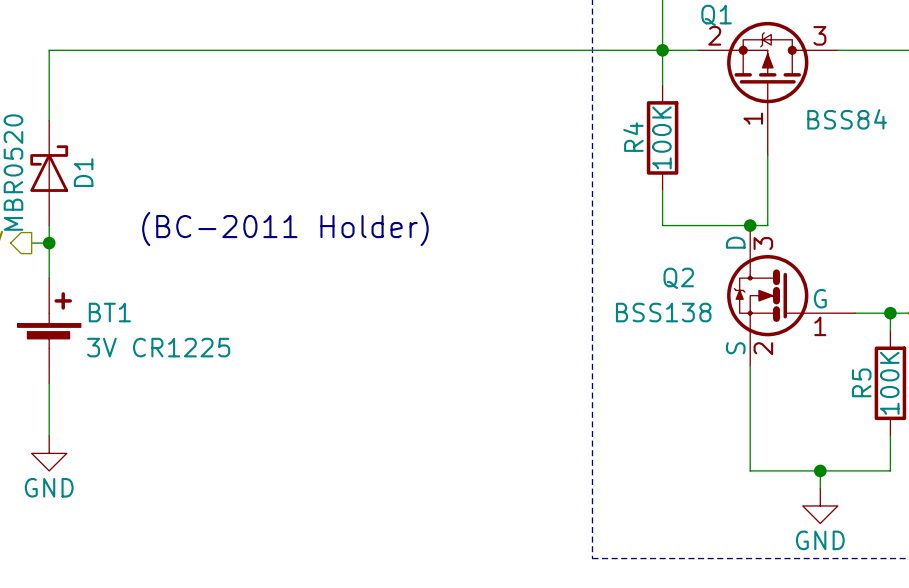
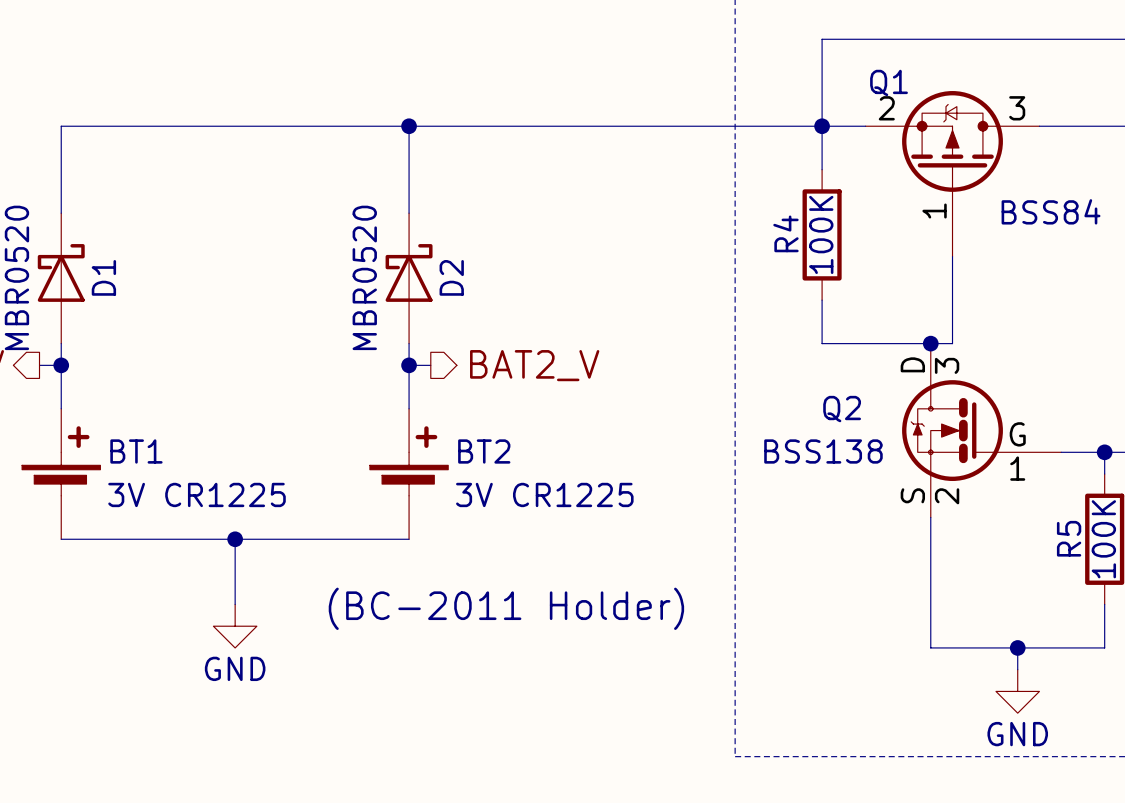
wire: none -> (409, 126) (409, 213)
junction: none -> (409, 126)
D2: none -> MBR0520 (409, 278)
wire: none -> (409, 343) (409, 408)
text position: (BC-2011 Holder) (285, 229) -> (BC-2011 Holder) (506, 608)
wire: none -> (409, 365) (430, 365)
junction: none -> (409, 365)
hierarchical label: none -> BAT2_V (534, 365)
BT2: none -> 3V CR1225 (409, 474)
wire: (49, 383) (49, 435) -> (61, 539) (409, 539)
wire: none -> (235, 539) (235, 604)
junction: none -> (235, 539)
power symbol position: GND (49, 453) -> GND (235, 626)

